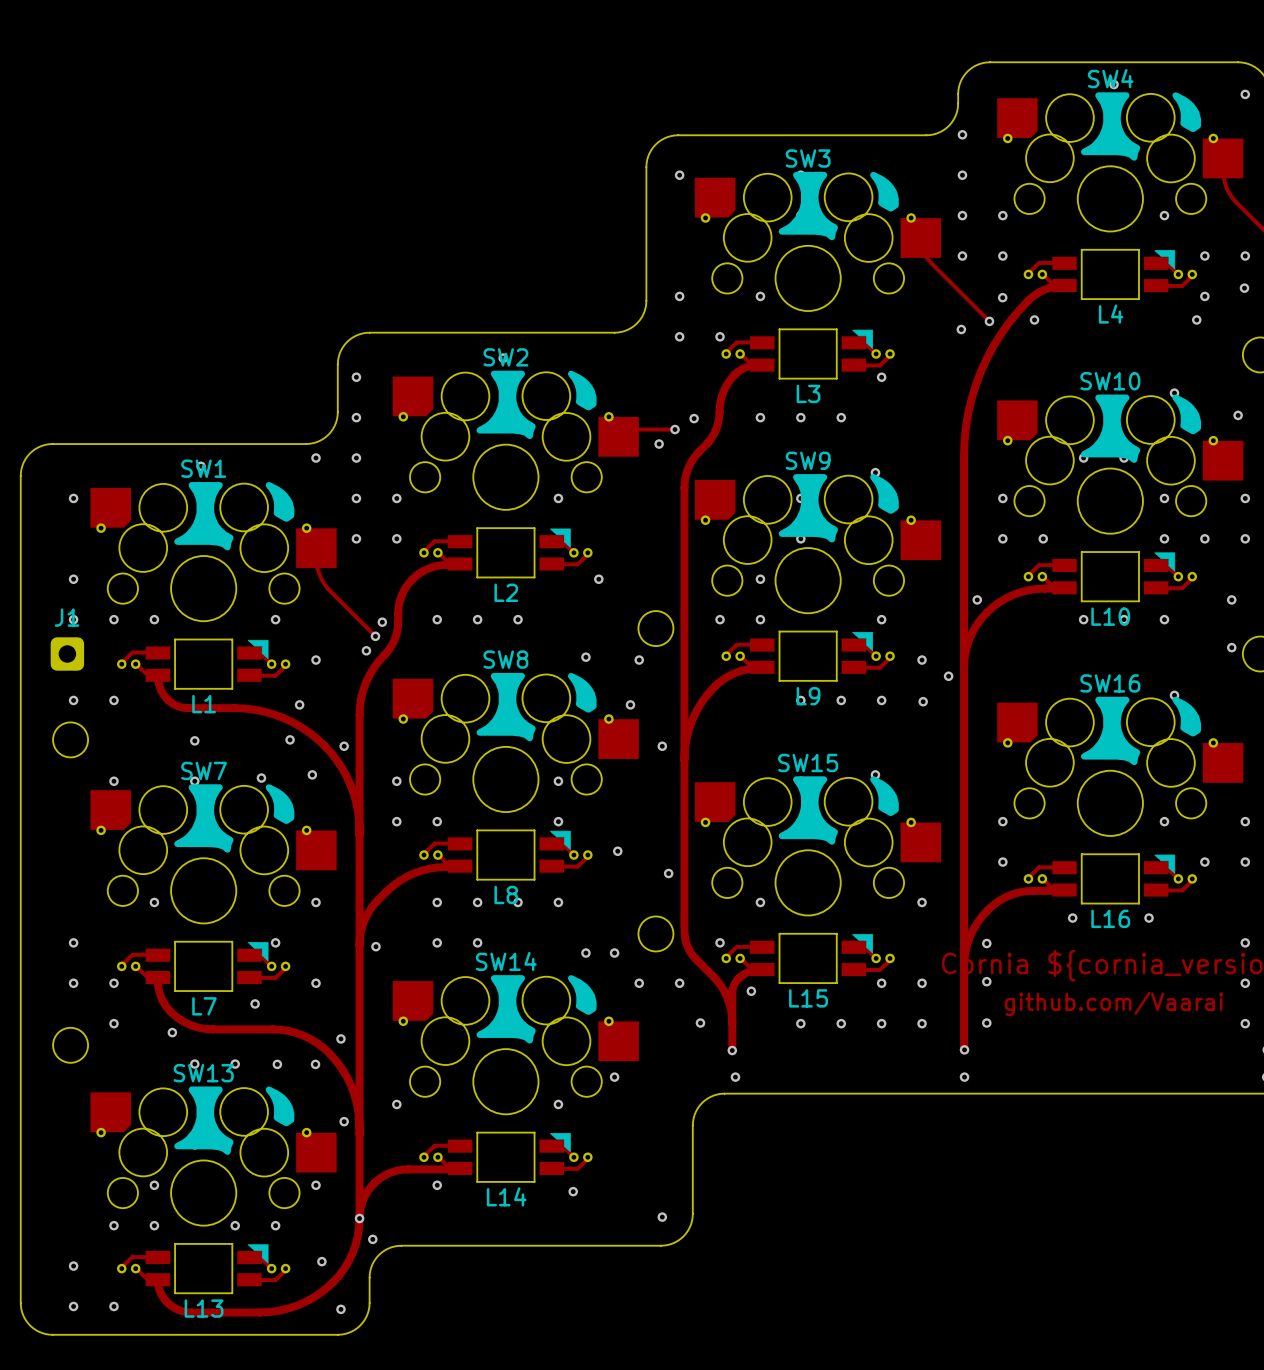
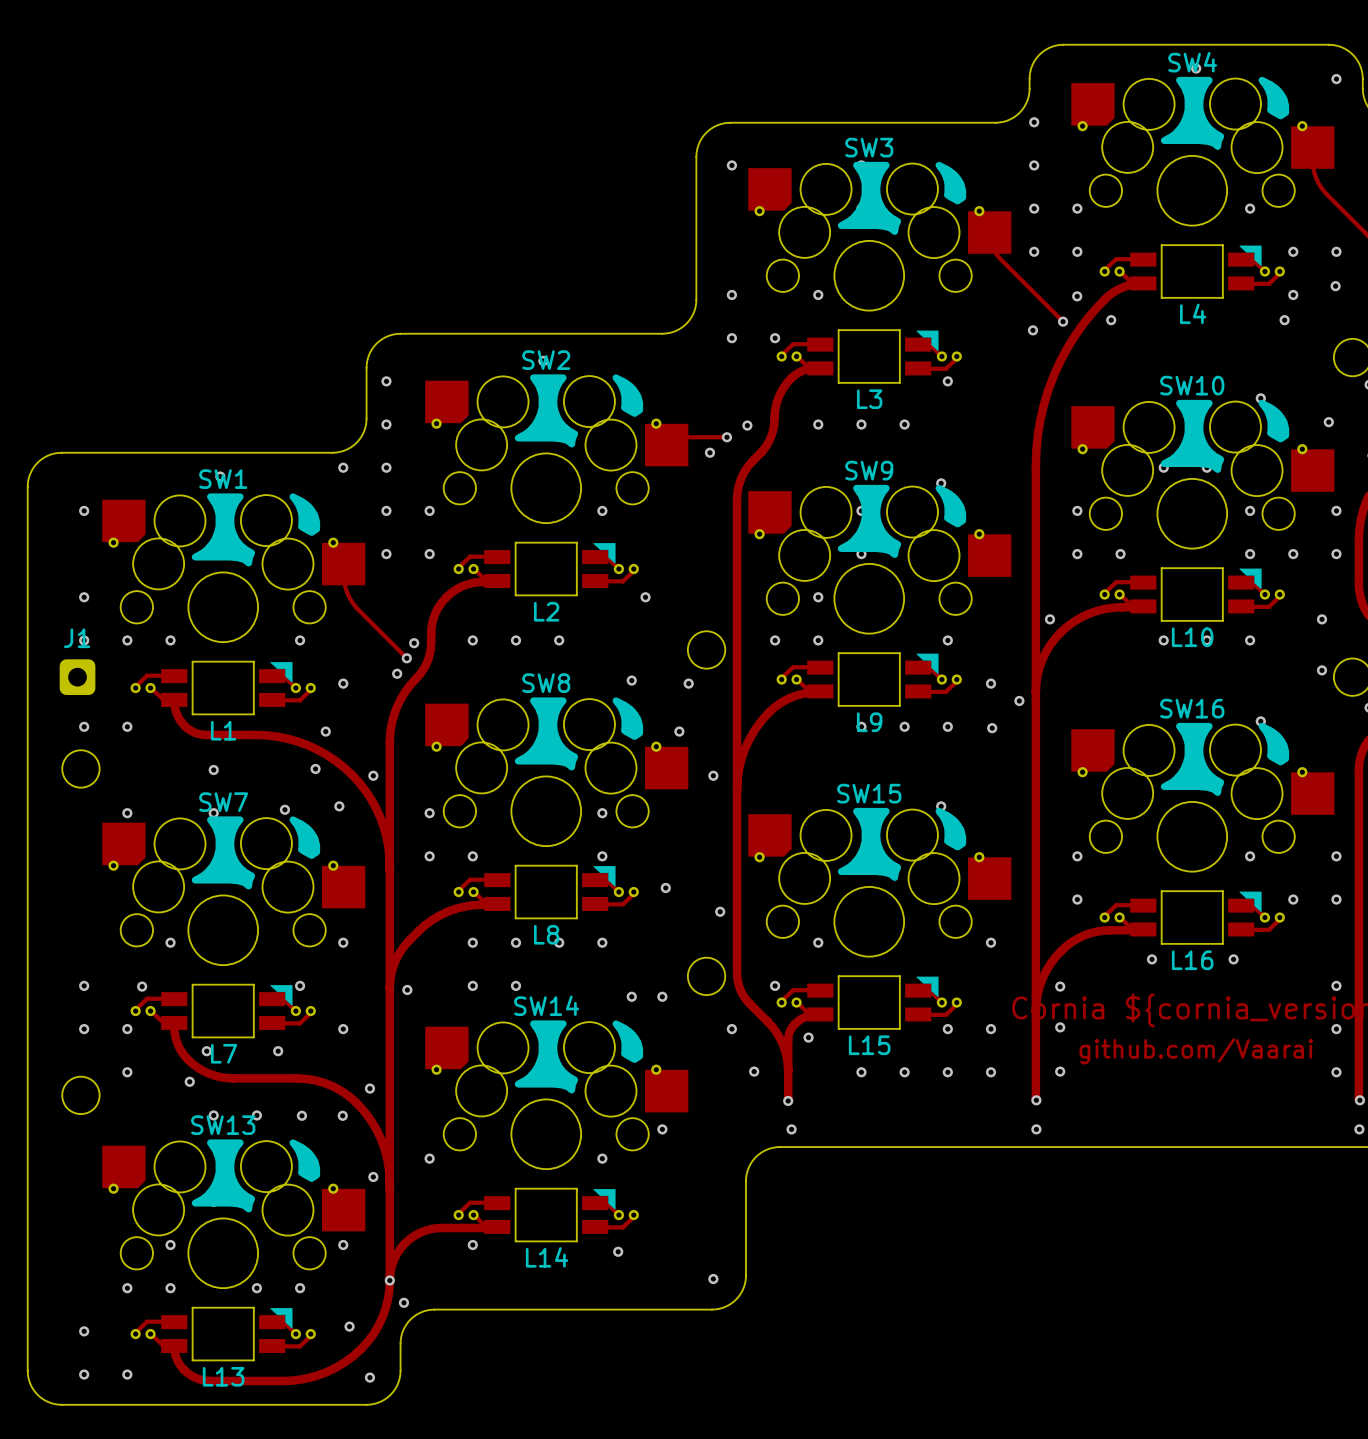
via: none -> (142, 986)
via: (639, 983) -> none
via: none -> (206, 1051)

